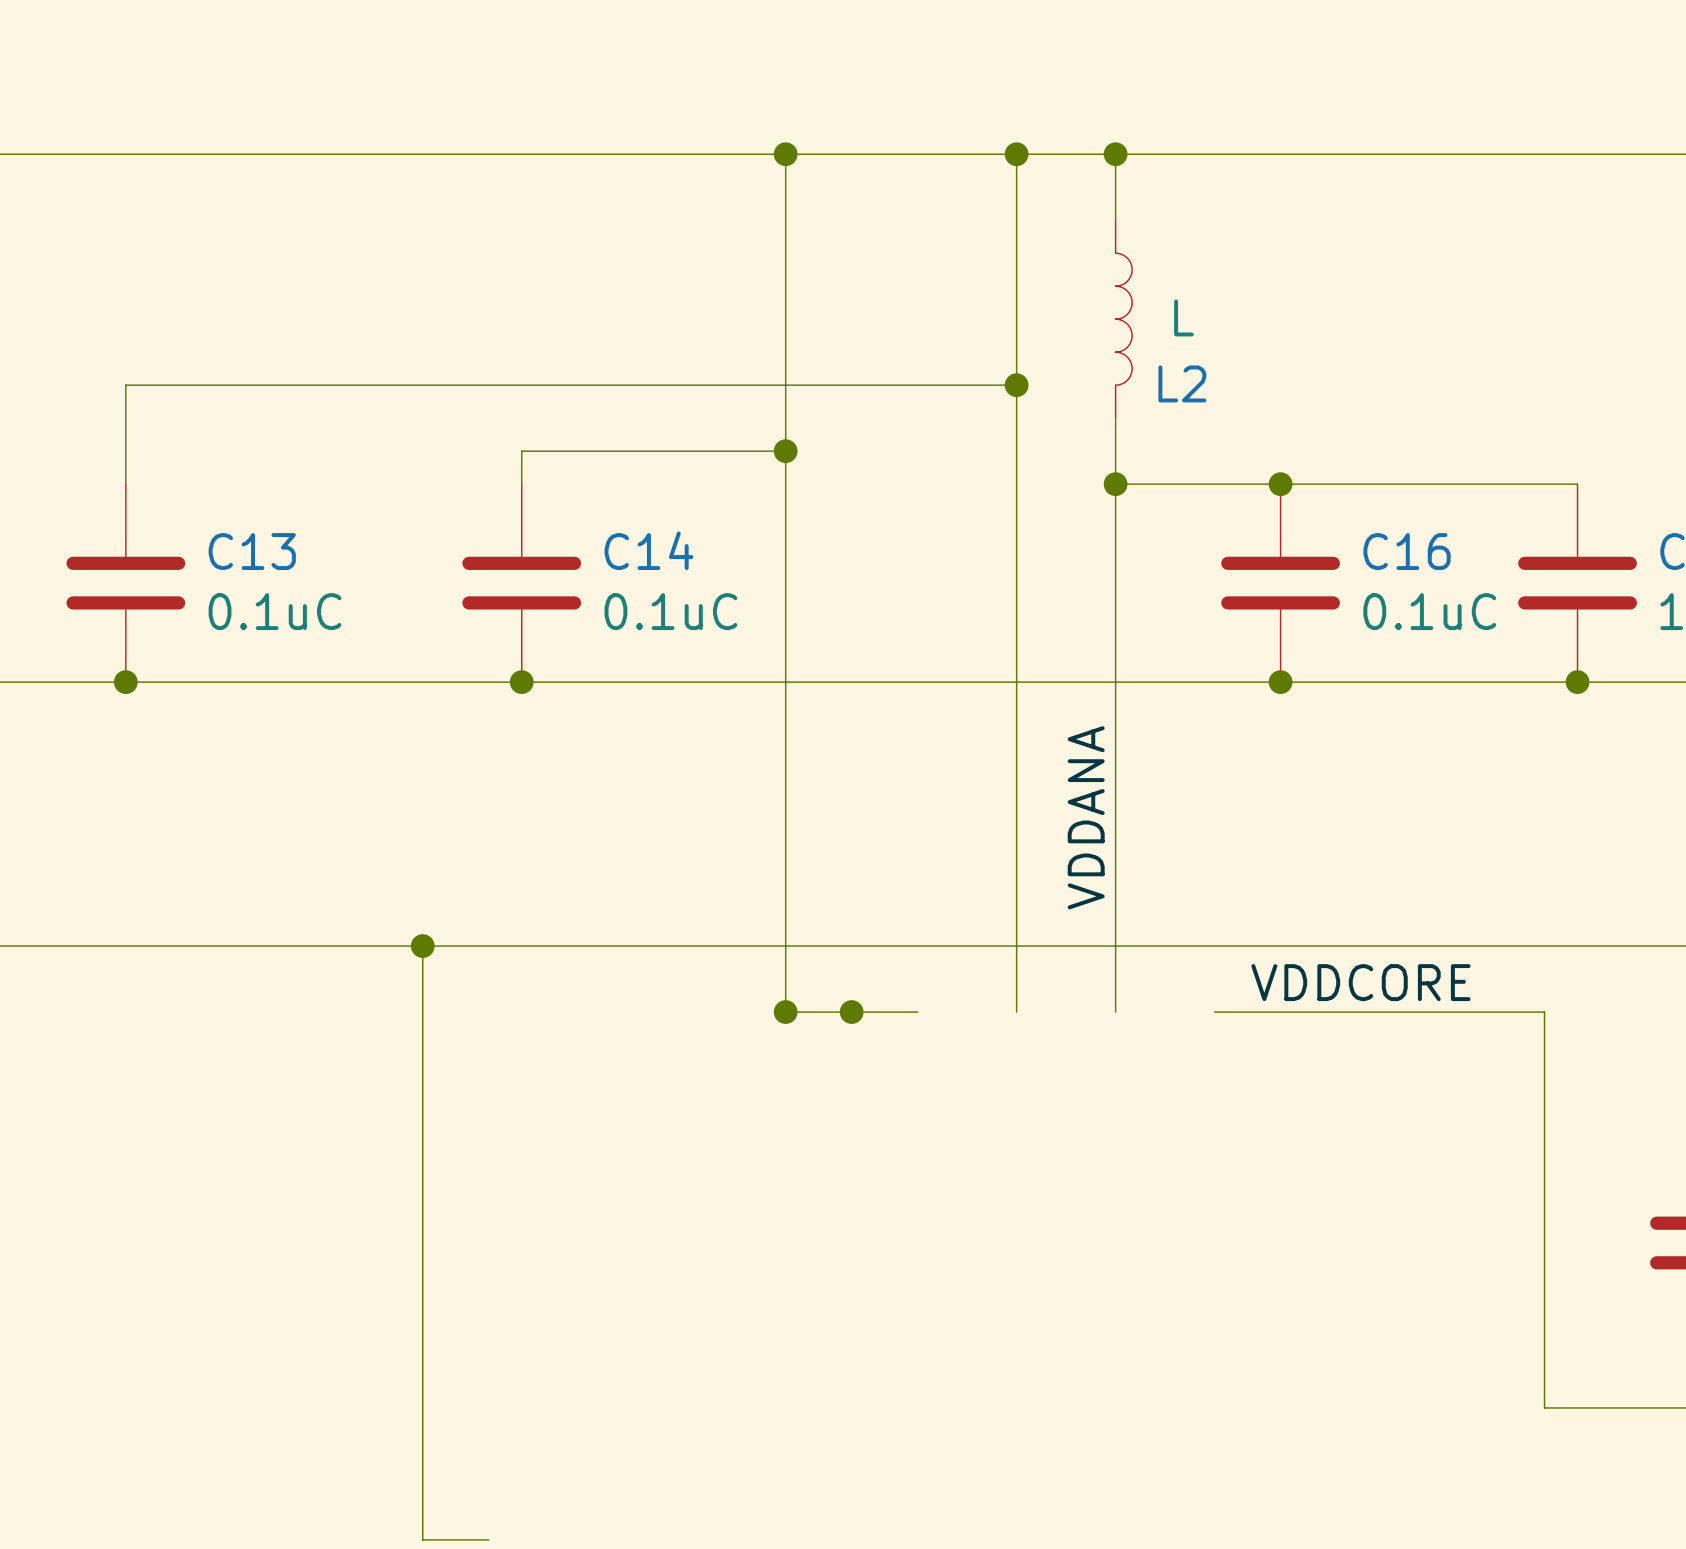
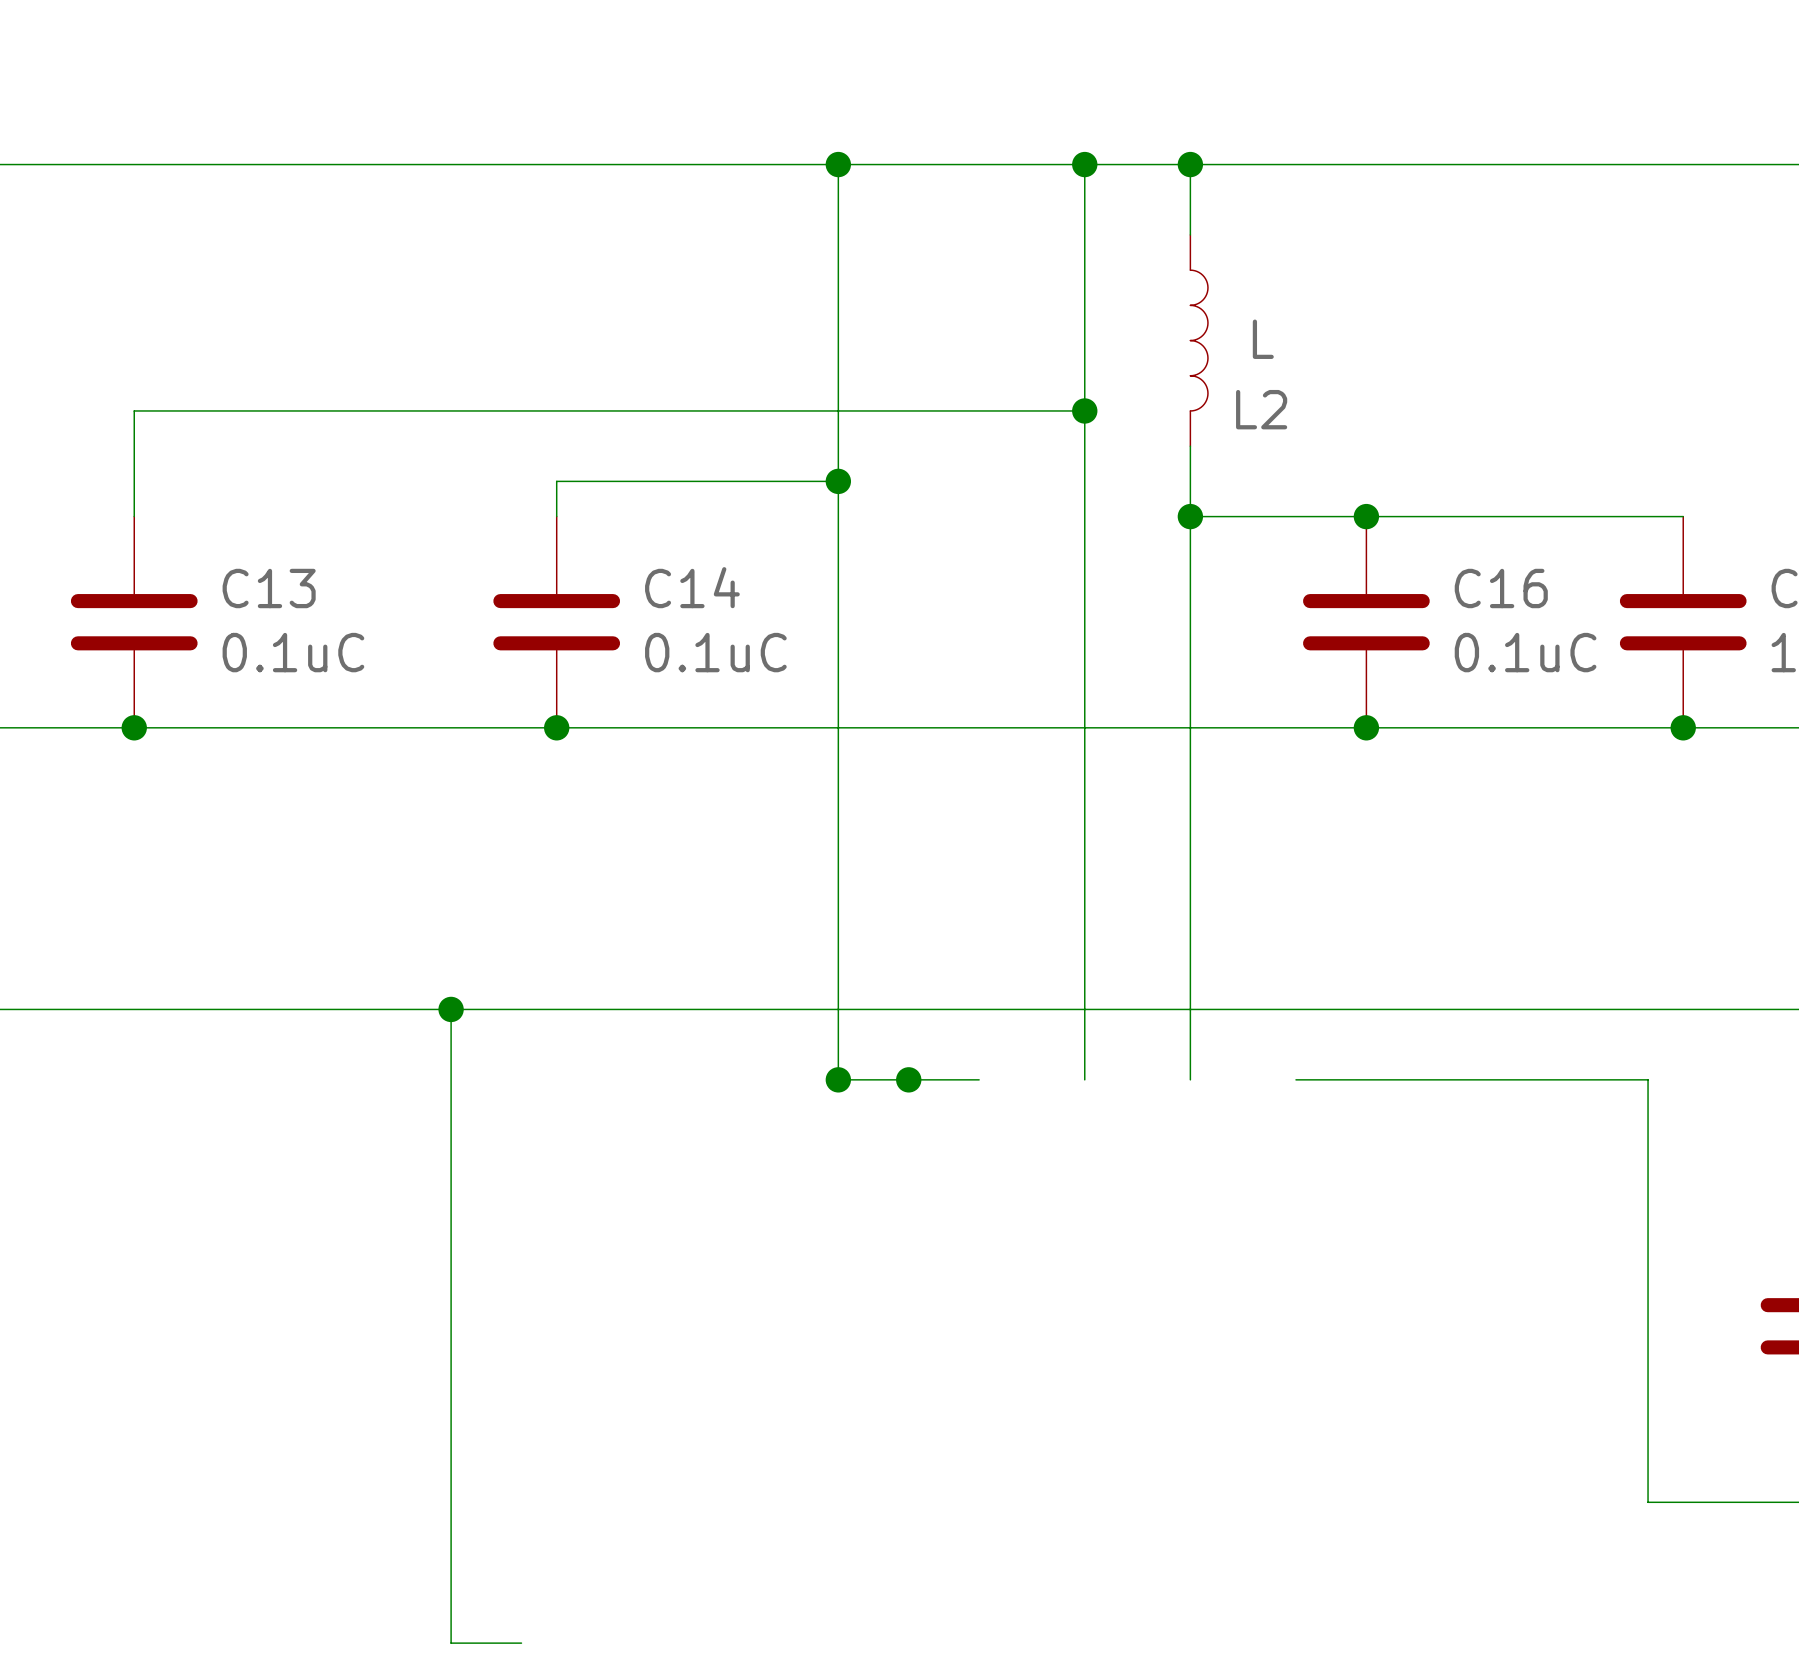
label: VDDANA (1086, 817) -> none
label: VDDCORE (1360, 982) -> none

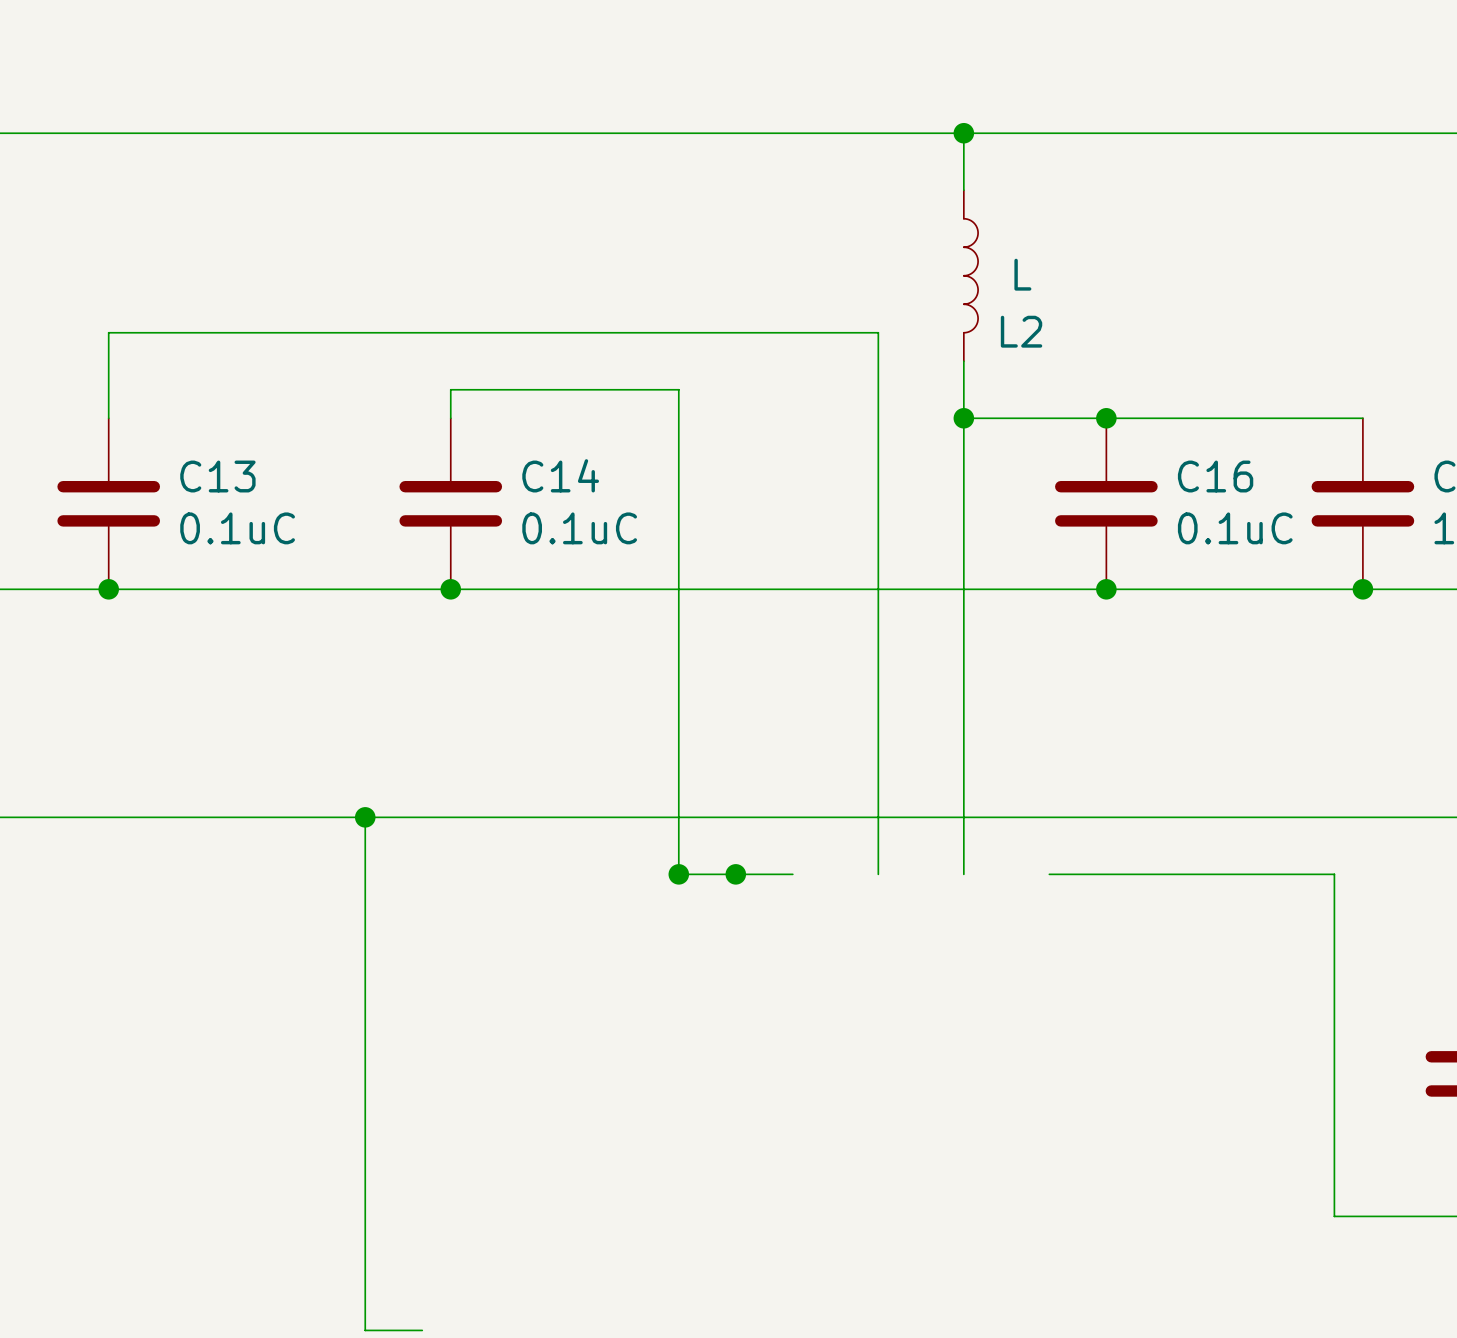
wire: (838, 164) (838, 481) -> none
junction: (838, 164) -> none
wire: (1084, 164) (1084, 410) -> none
junction: (1084, 164) -> none
junction: (1084, 410) -> none
junction: (838, 481) -> none

